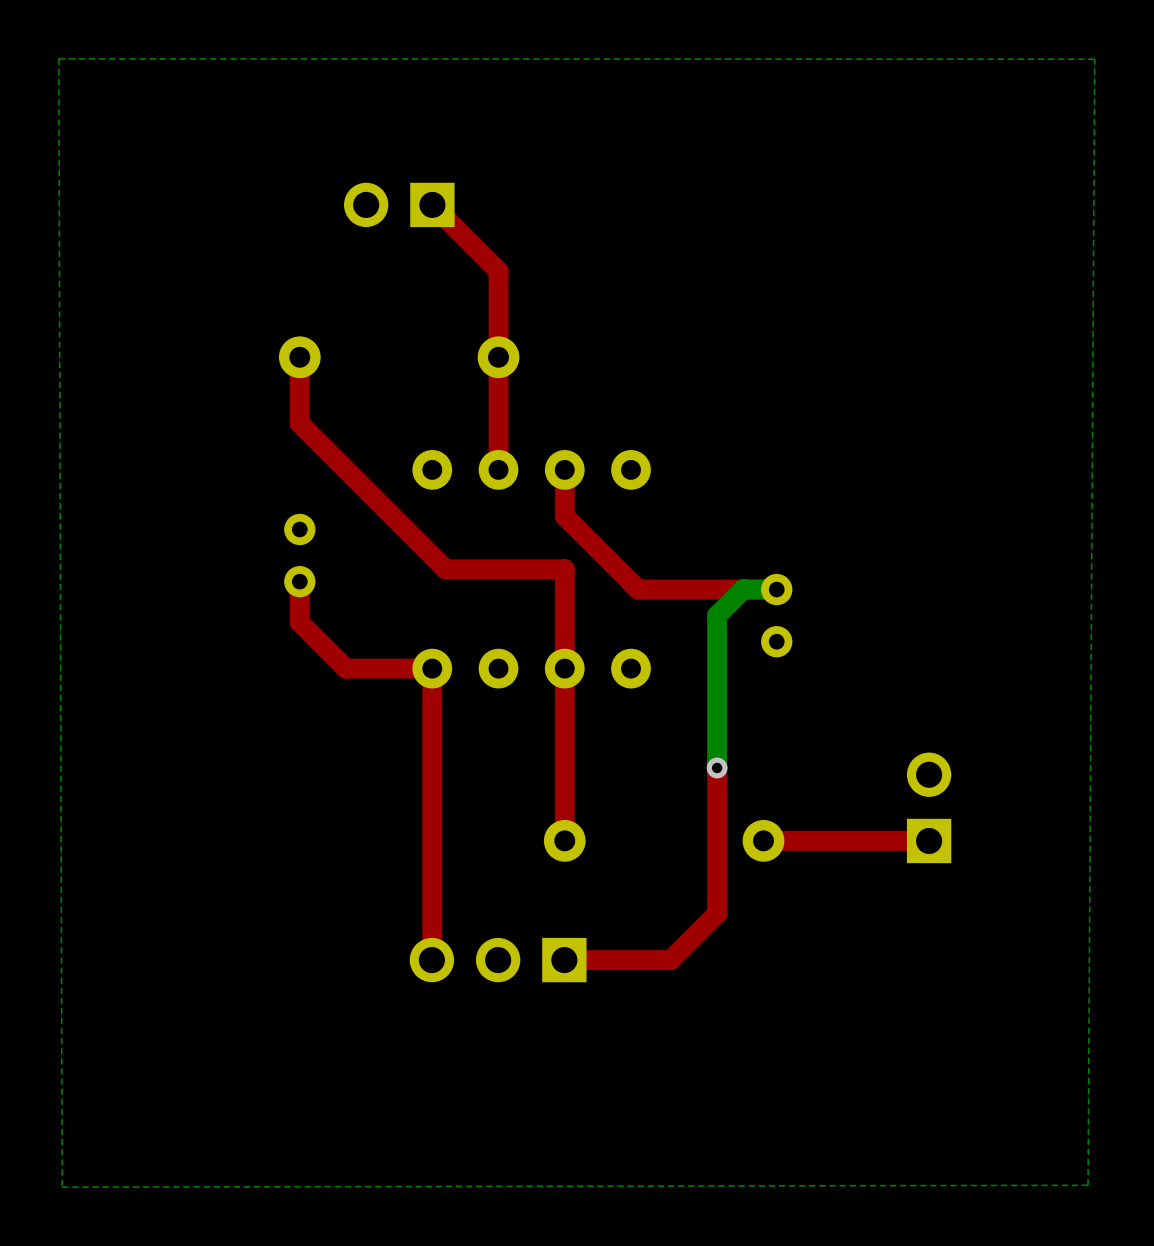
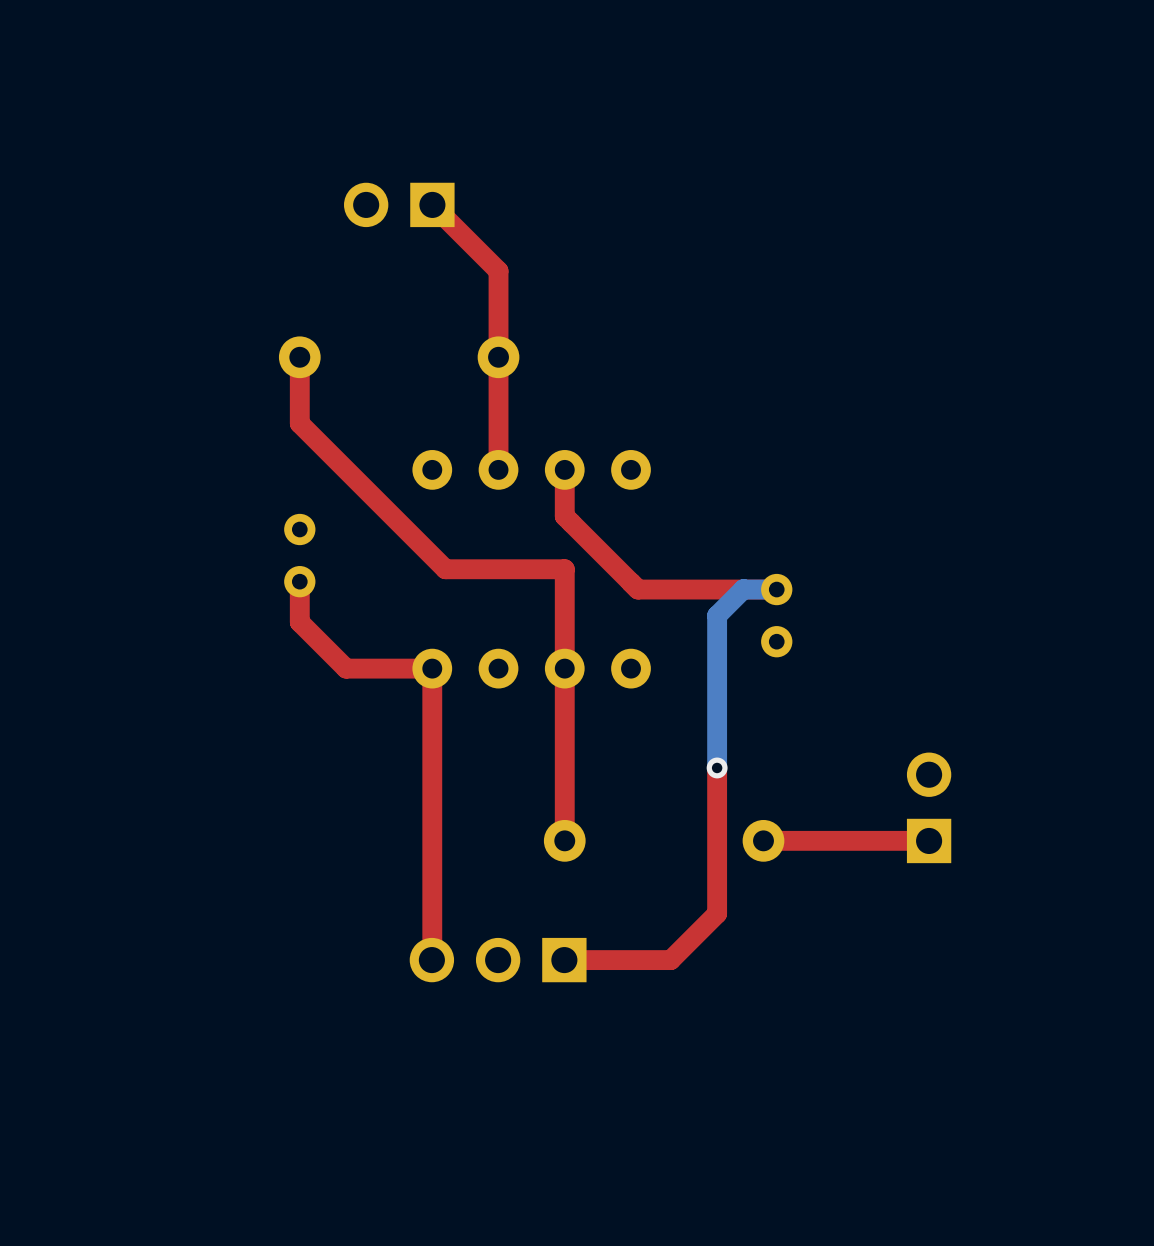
bottom zone outline: (58, 58) (1094, 59) (1088, 1185) (62, 1187) (58, 58) -> none

